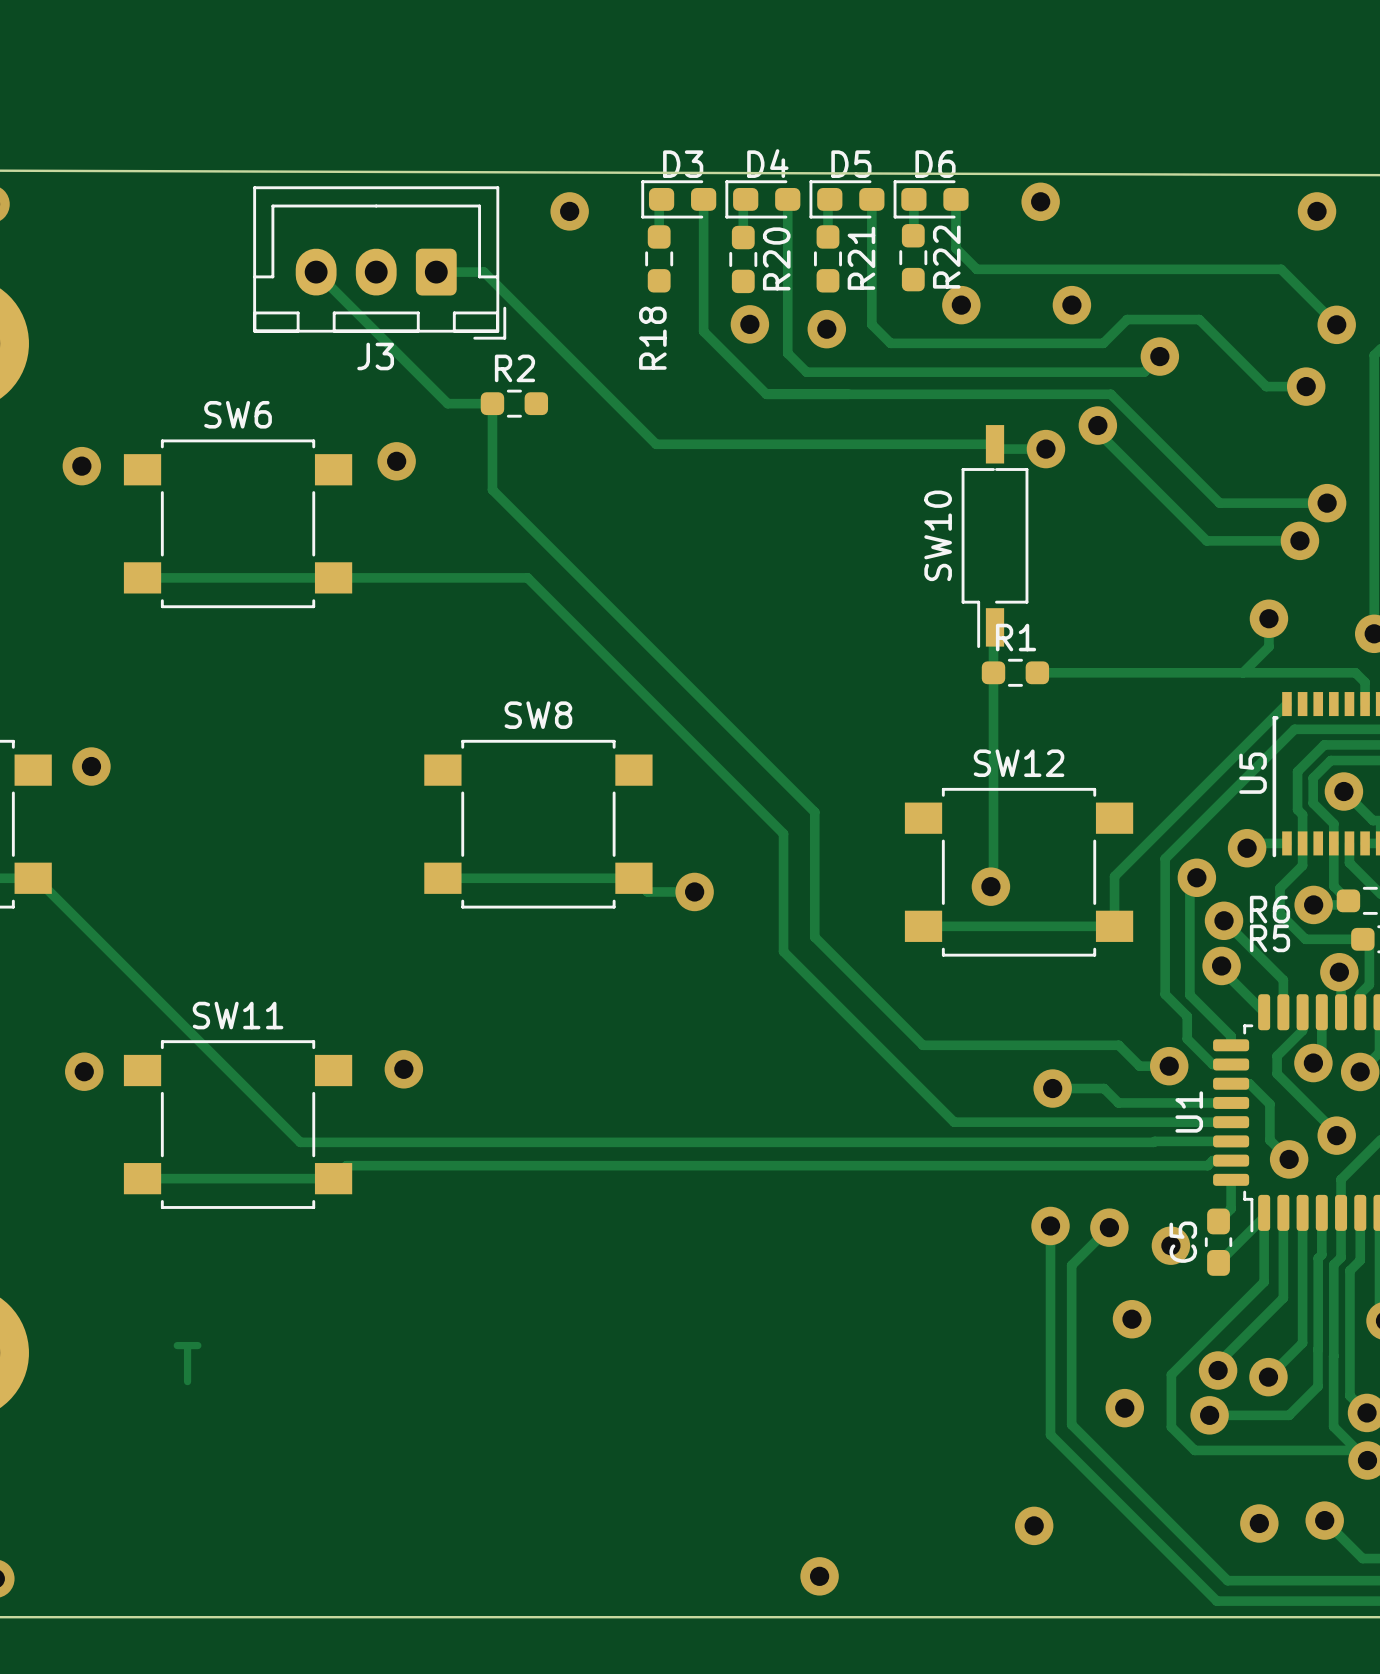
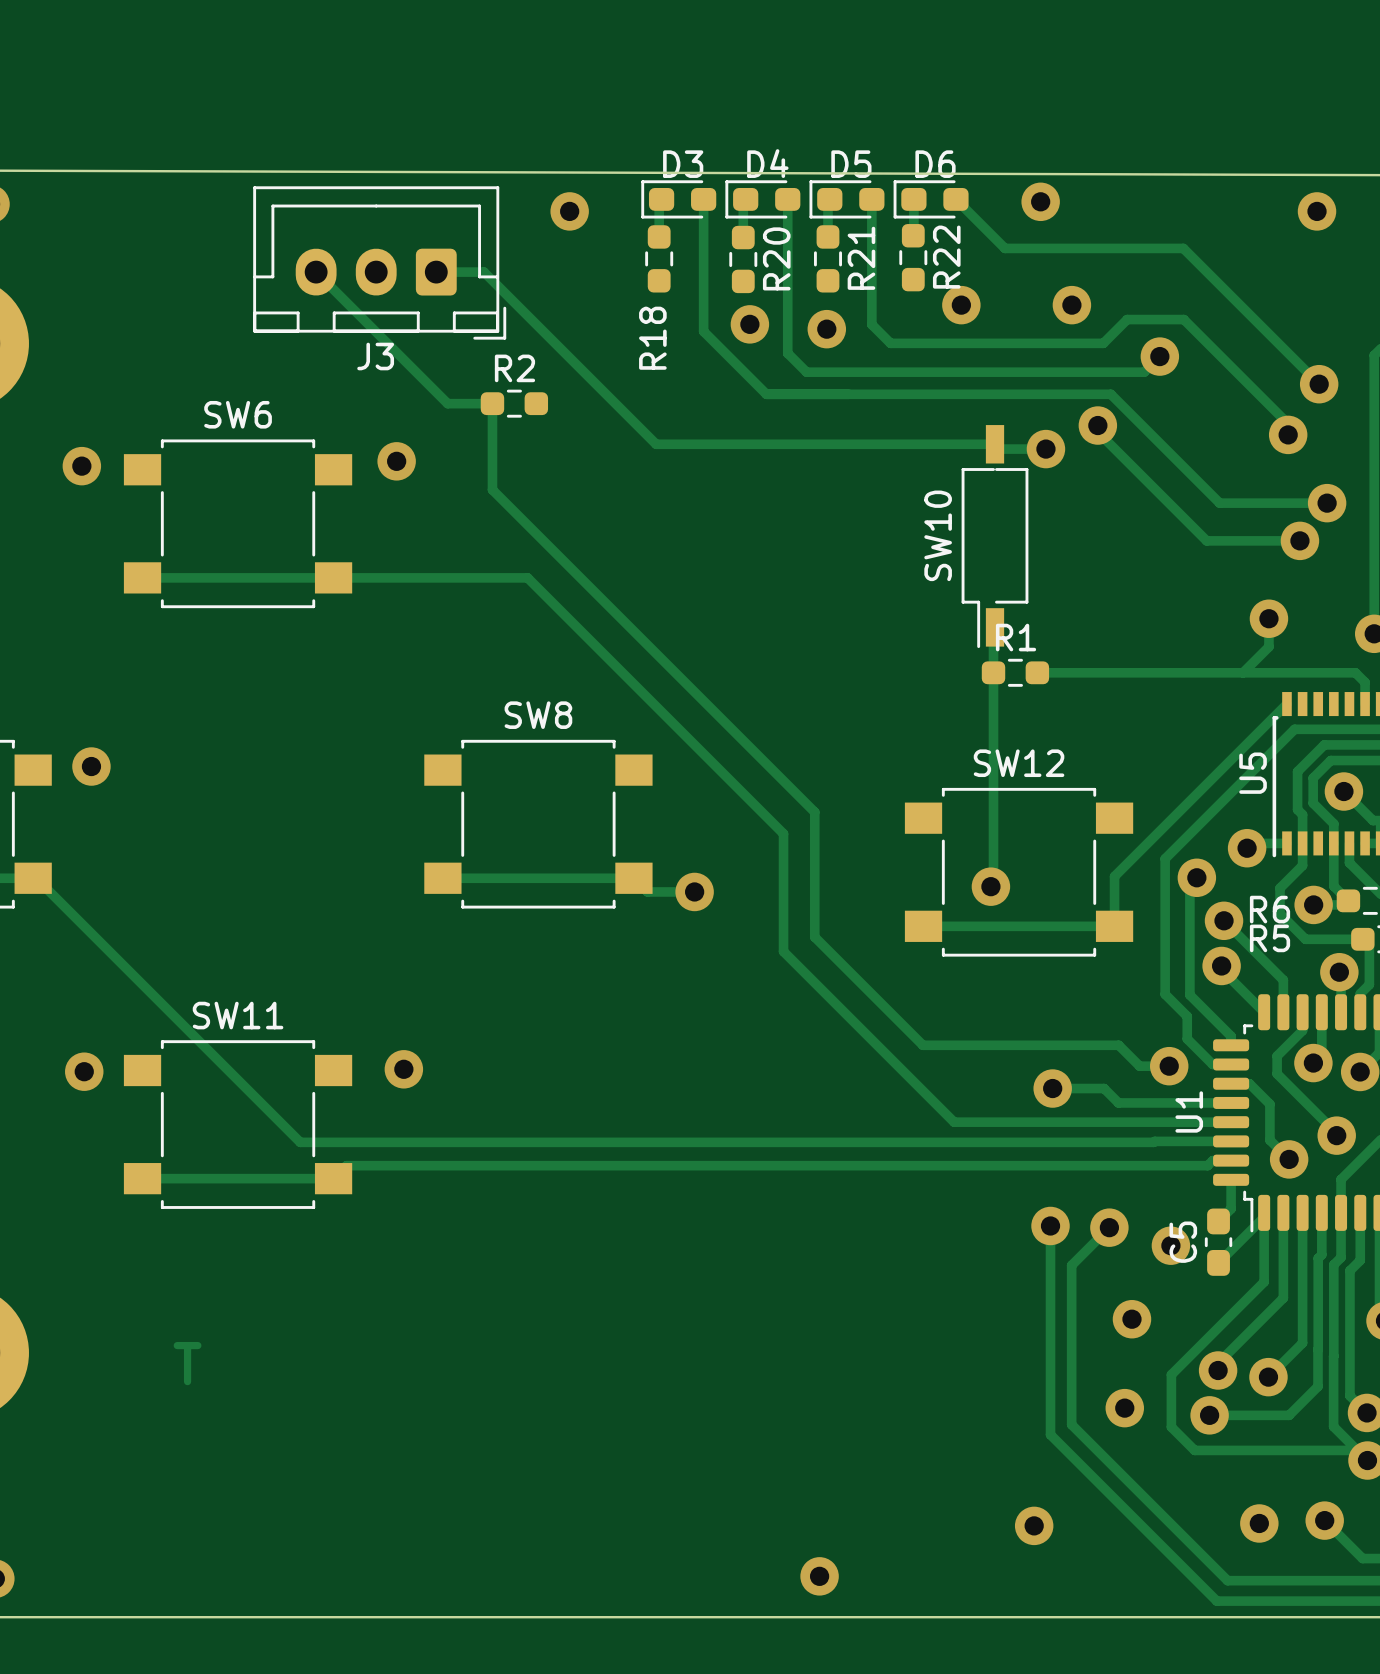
track: (955, 199) (955, 248) (976, 269) (1281, 269) (1336, 324) -> (955, 199) (1004, 248) (1183, 248) (1319, 384)
track: (1183, 319) (1199, 319) (1266, 386) (1306, 386) -> (1183, 319) (1288, 423) (1288, 434)
via: (1336, 324) -> none
via position: (1306, 386) -> (1319, 384)
via: none -> (1288, 434)

